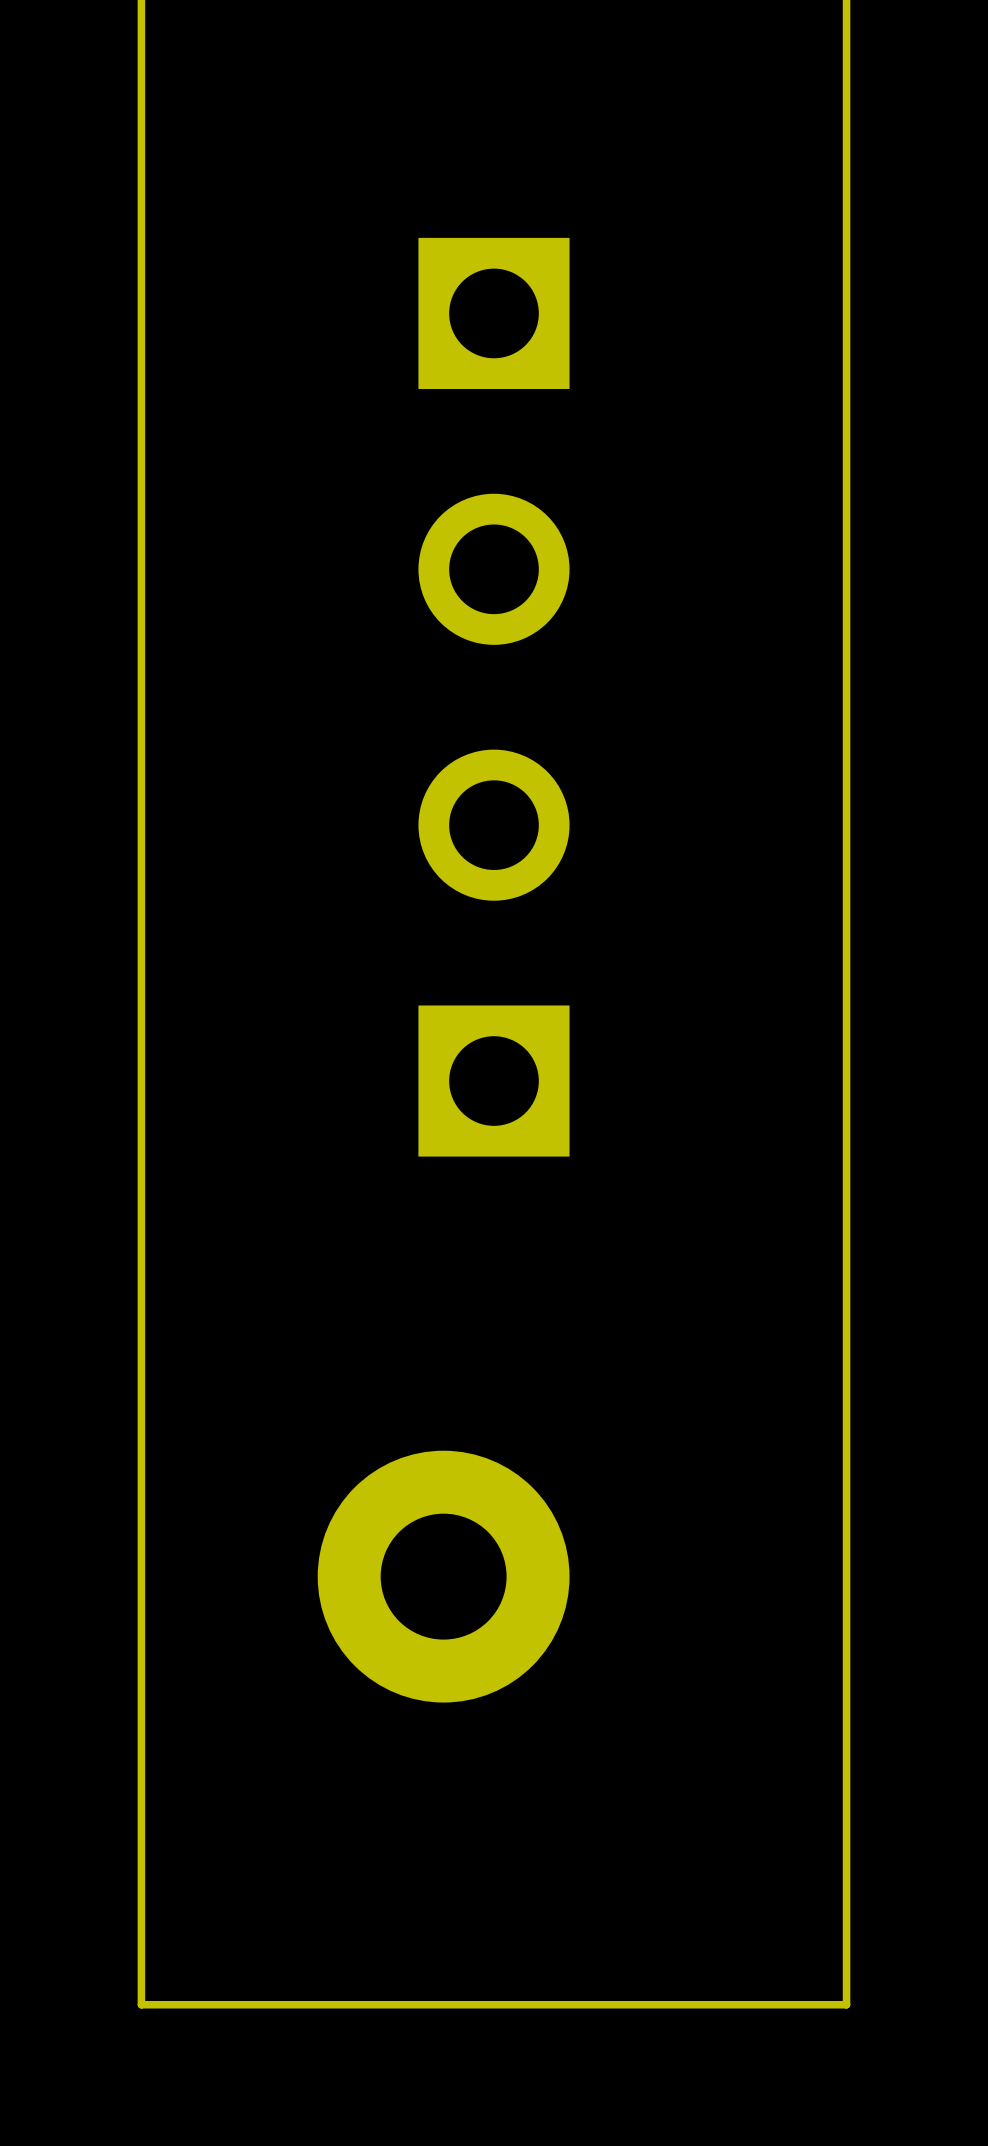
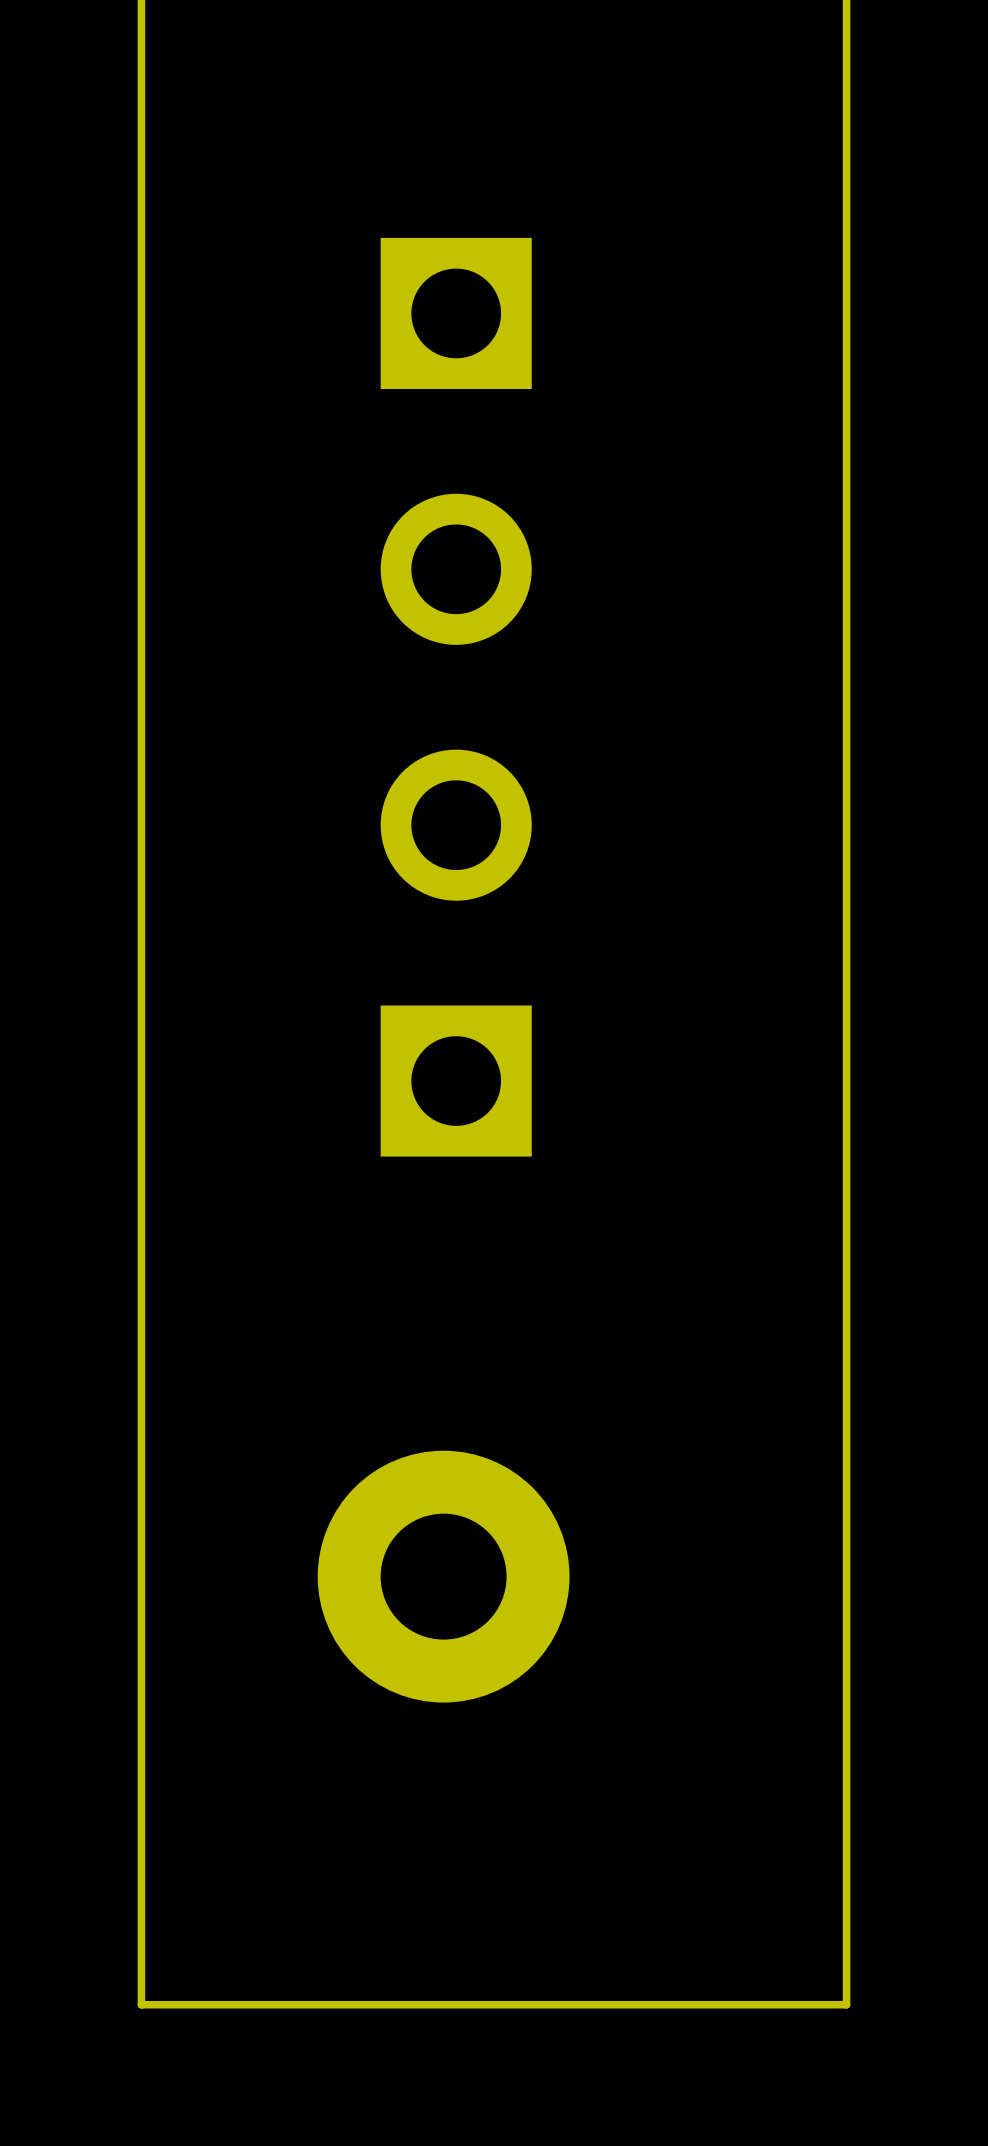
part position: (493, 697) -> (456, 697)

